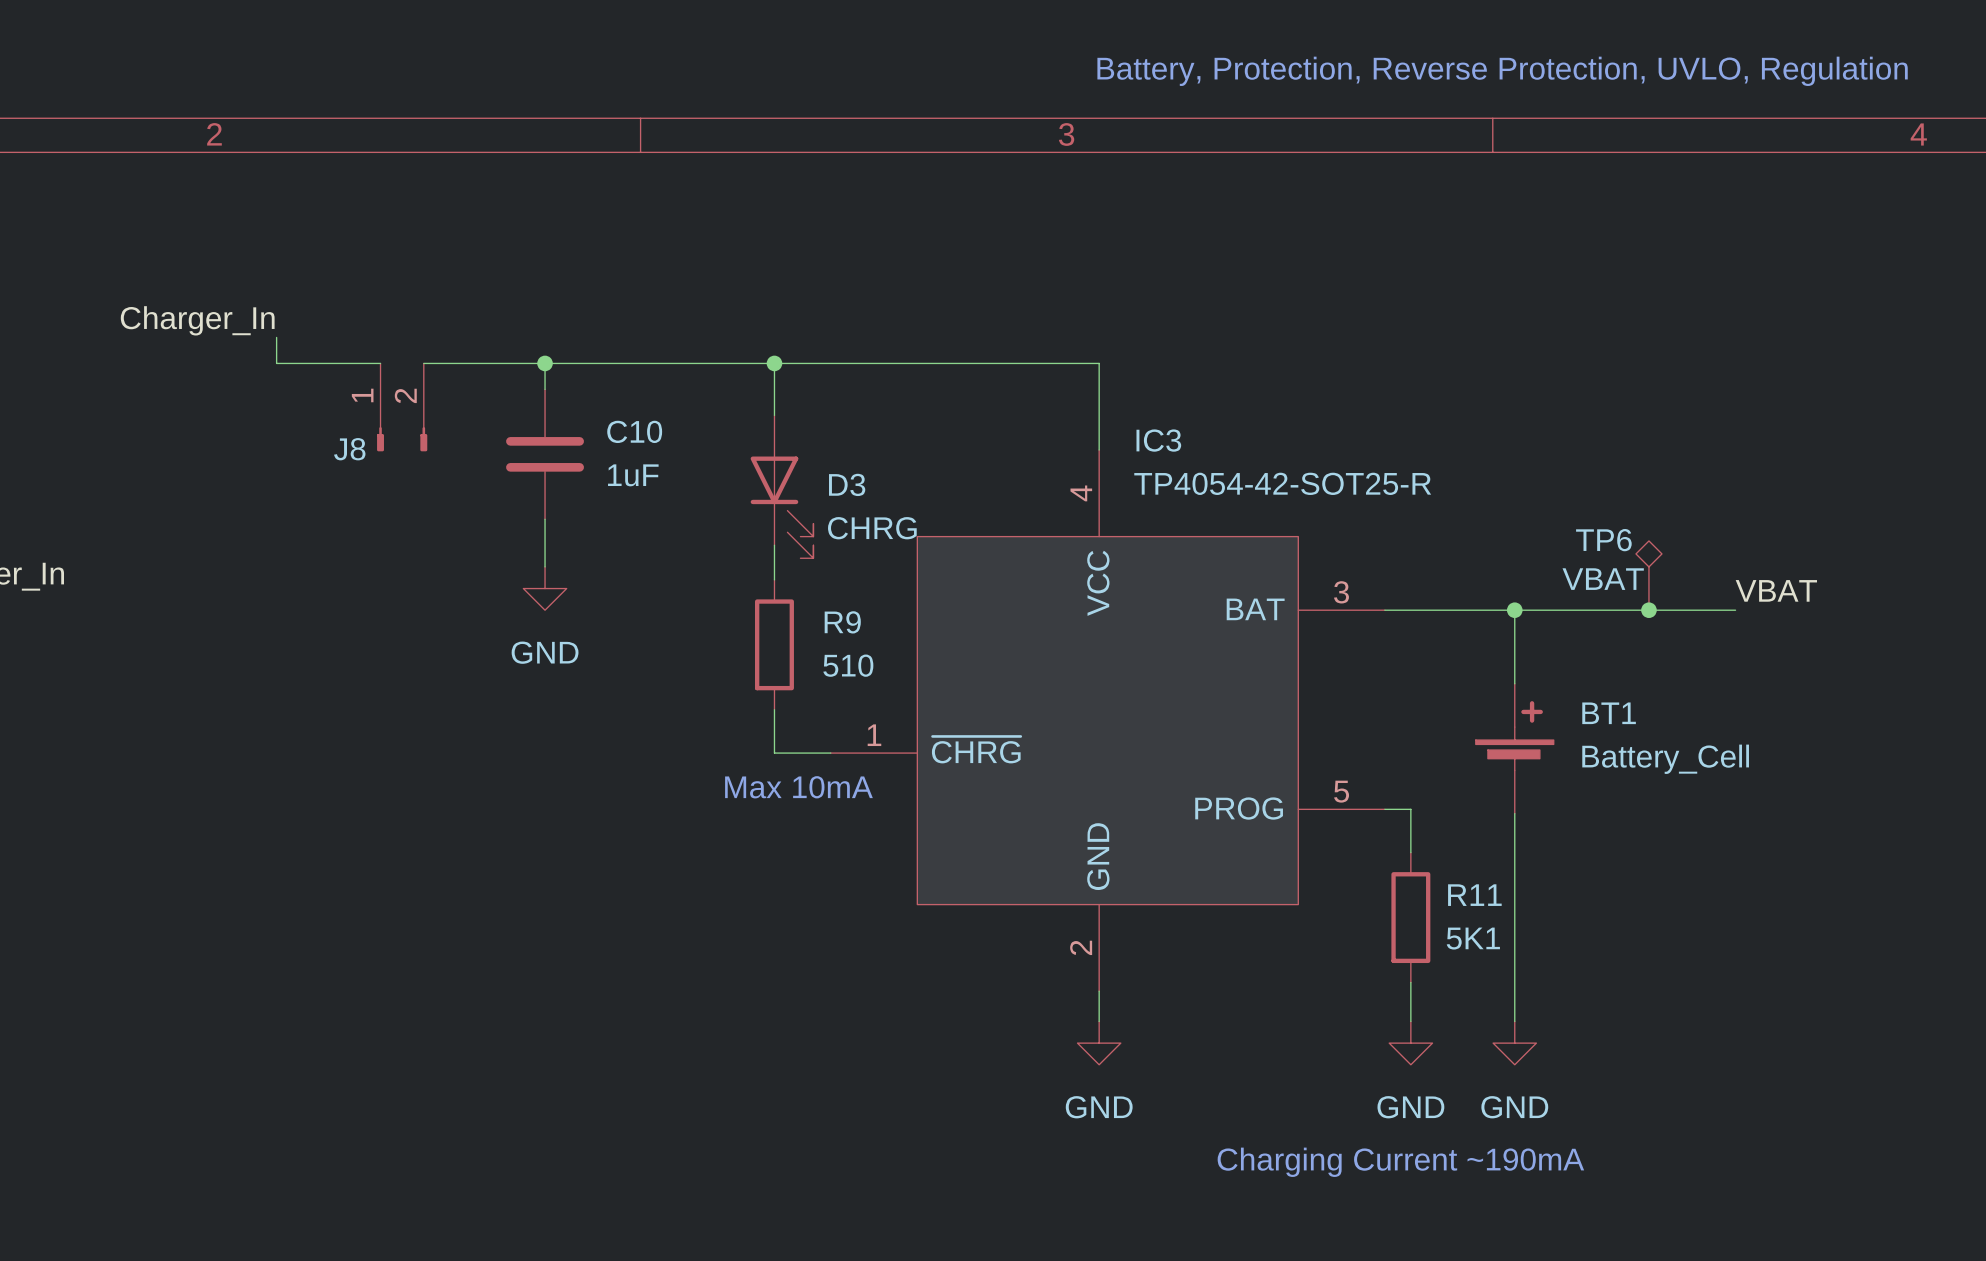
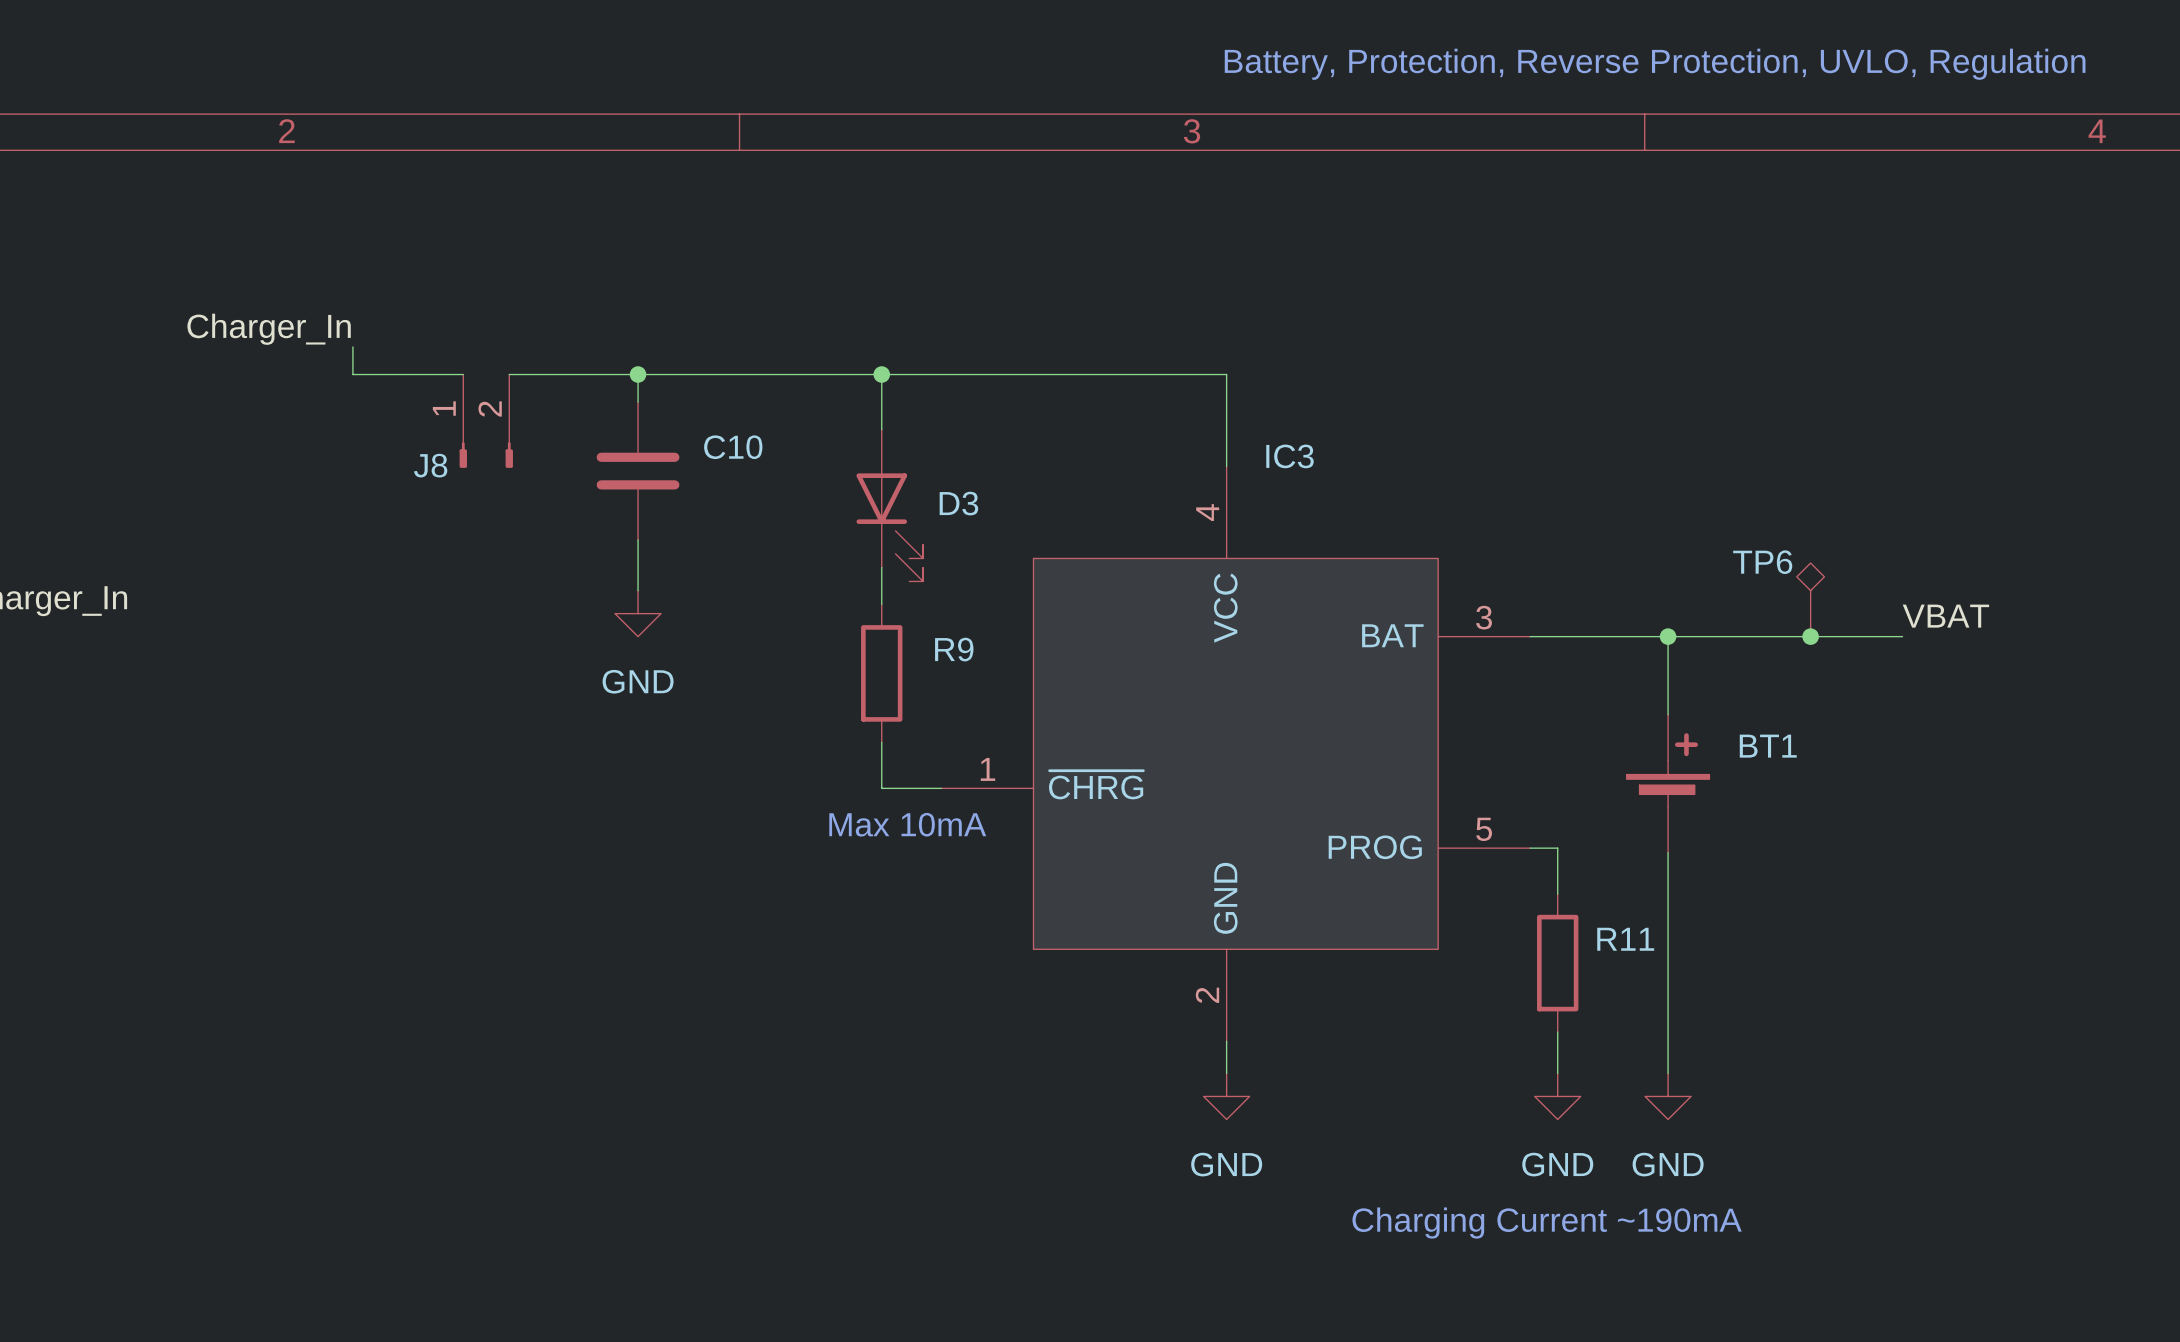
C10 value: 1uF (633, 475) -> none
IC3 value: TP4054-42-SOT25-R (1282, 483) -> none
D3 value: CHRG (872, 528) -> none
TP6 value: VBAT (1603, 579) -> none
R9 value: 510 (848, 665) -> none
BT1 value: Battery_Cell (1665, 759) -> none
R11 value: 5K1 (1473, 938) -> none

